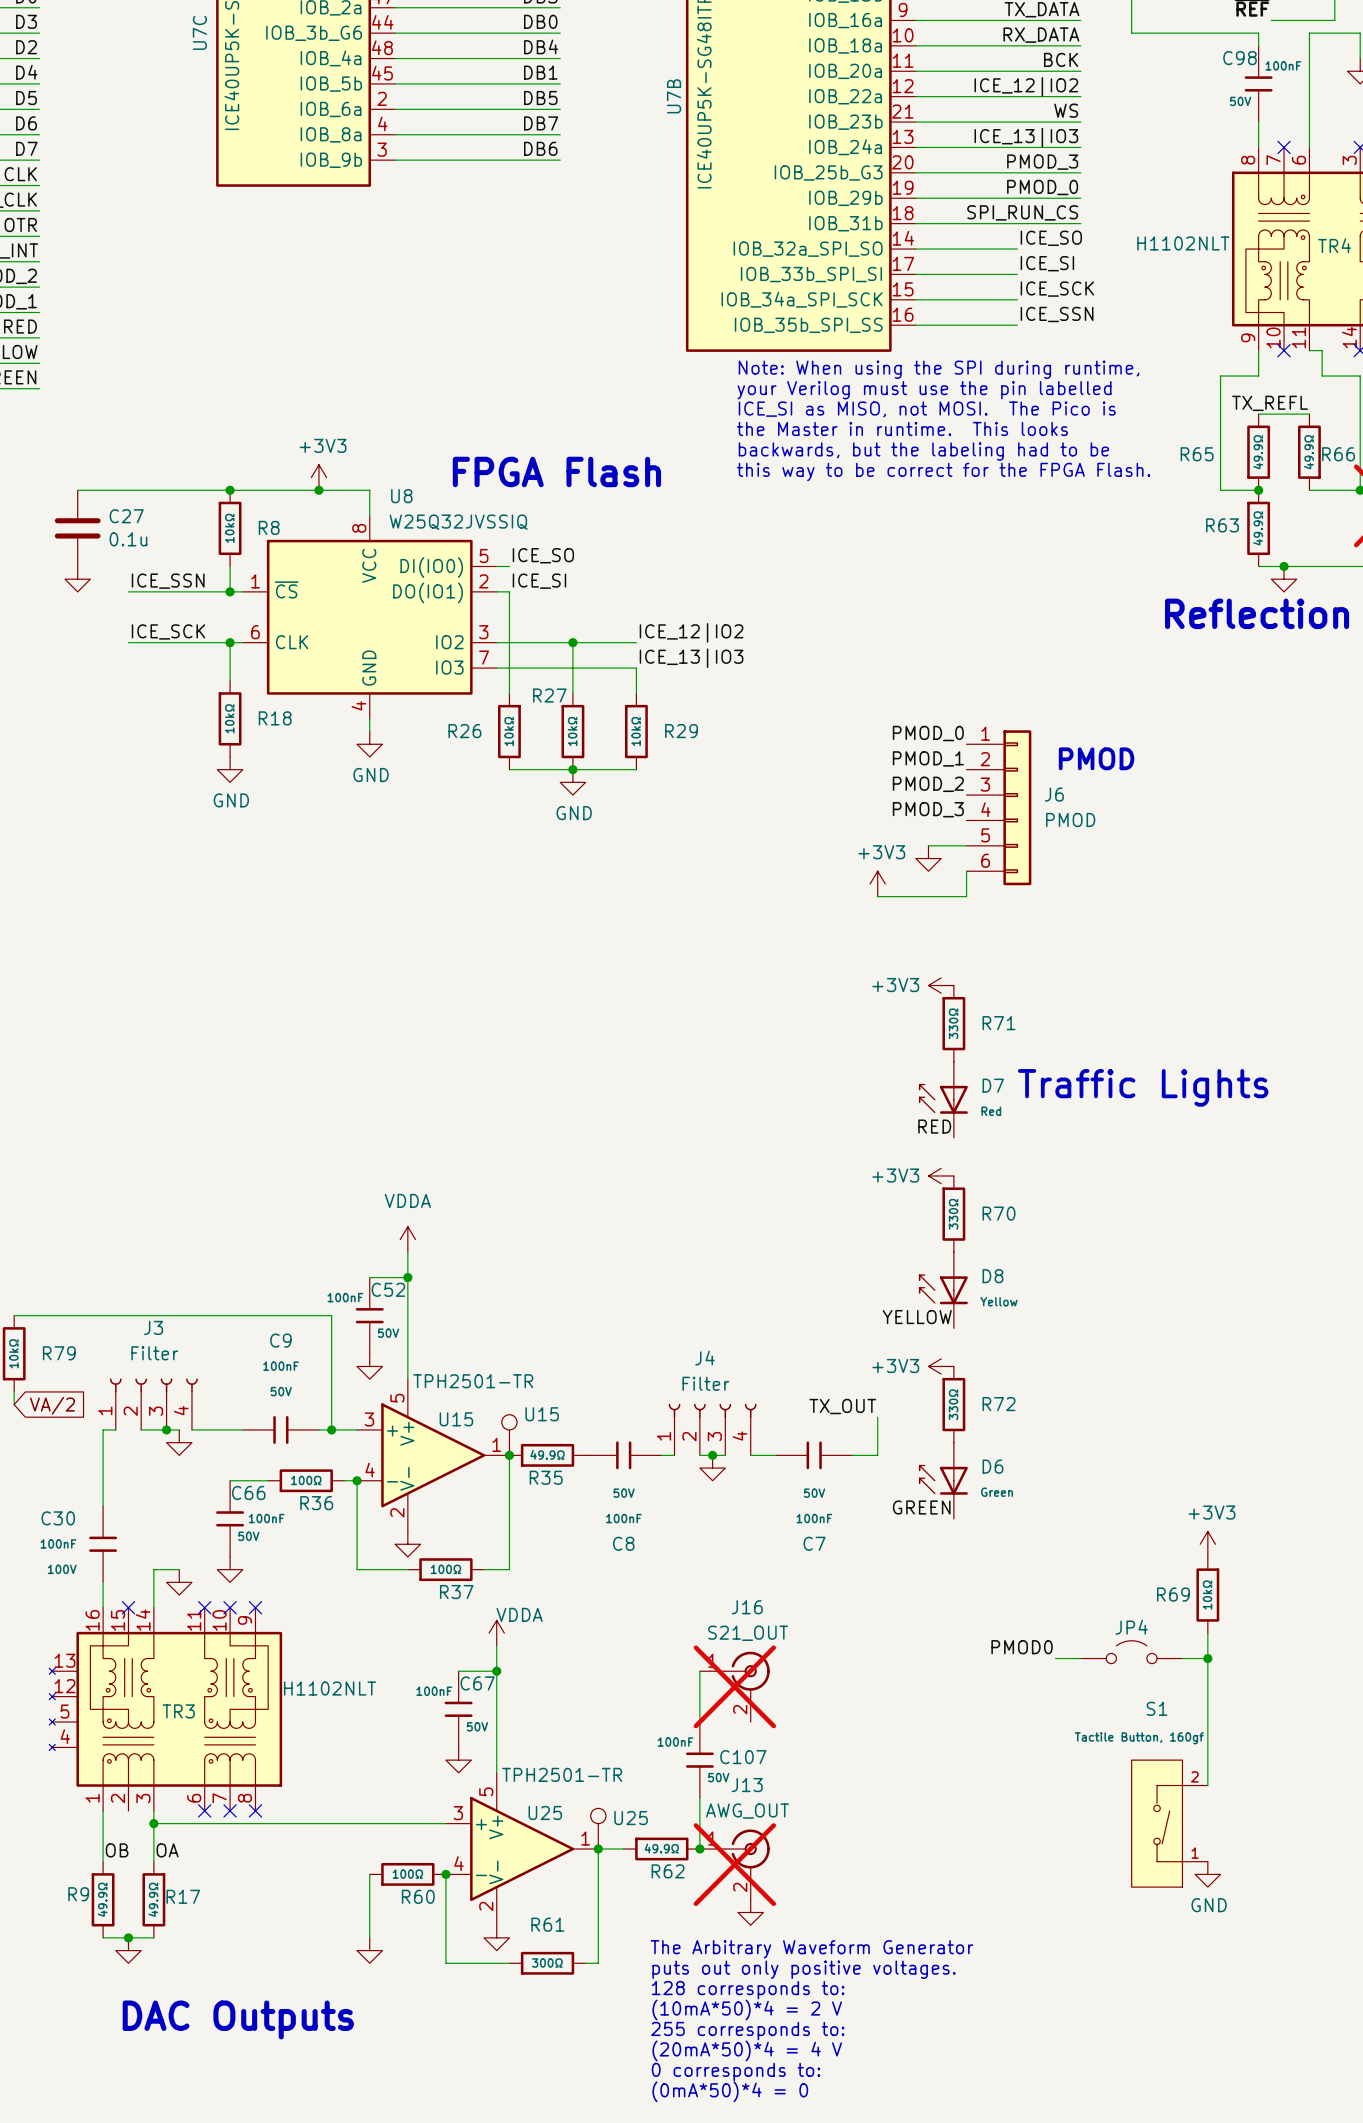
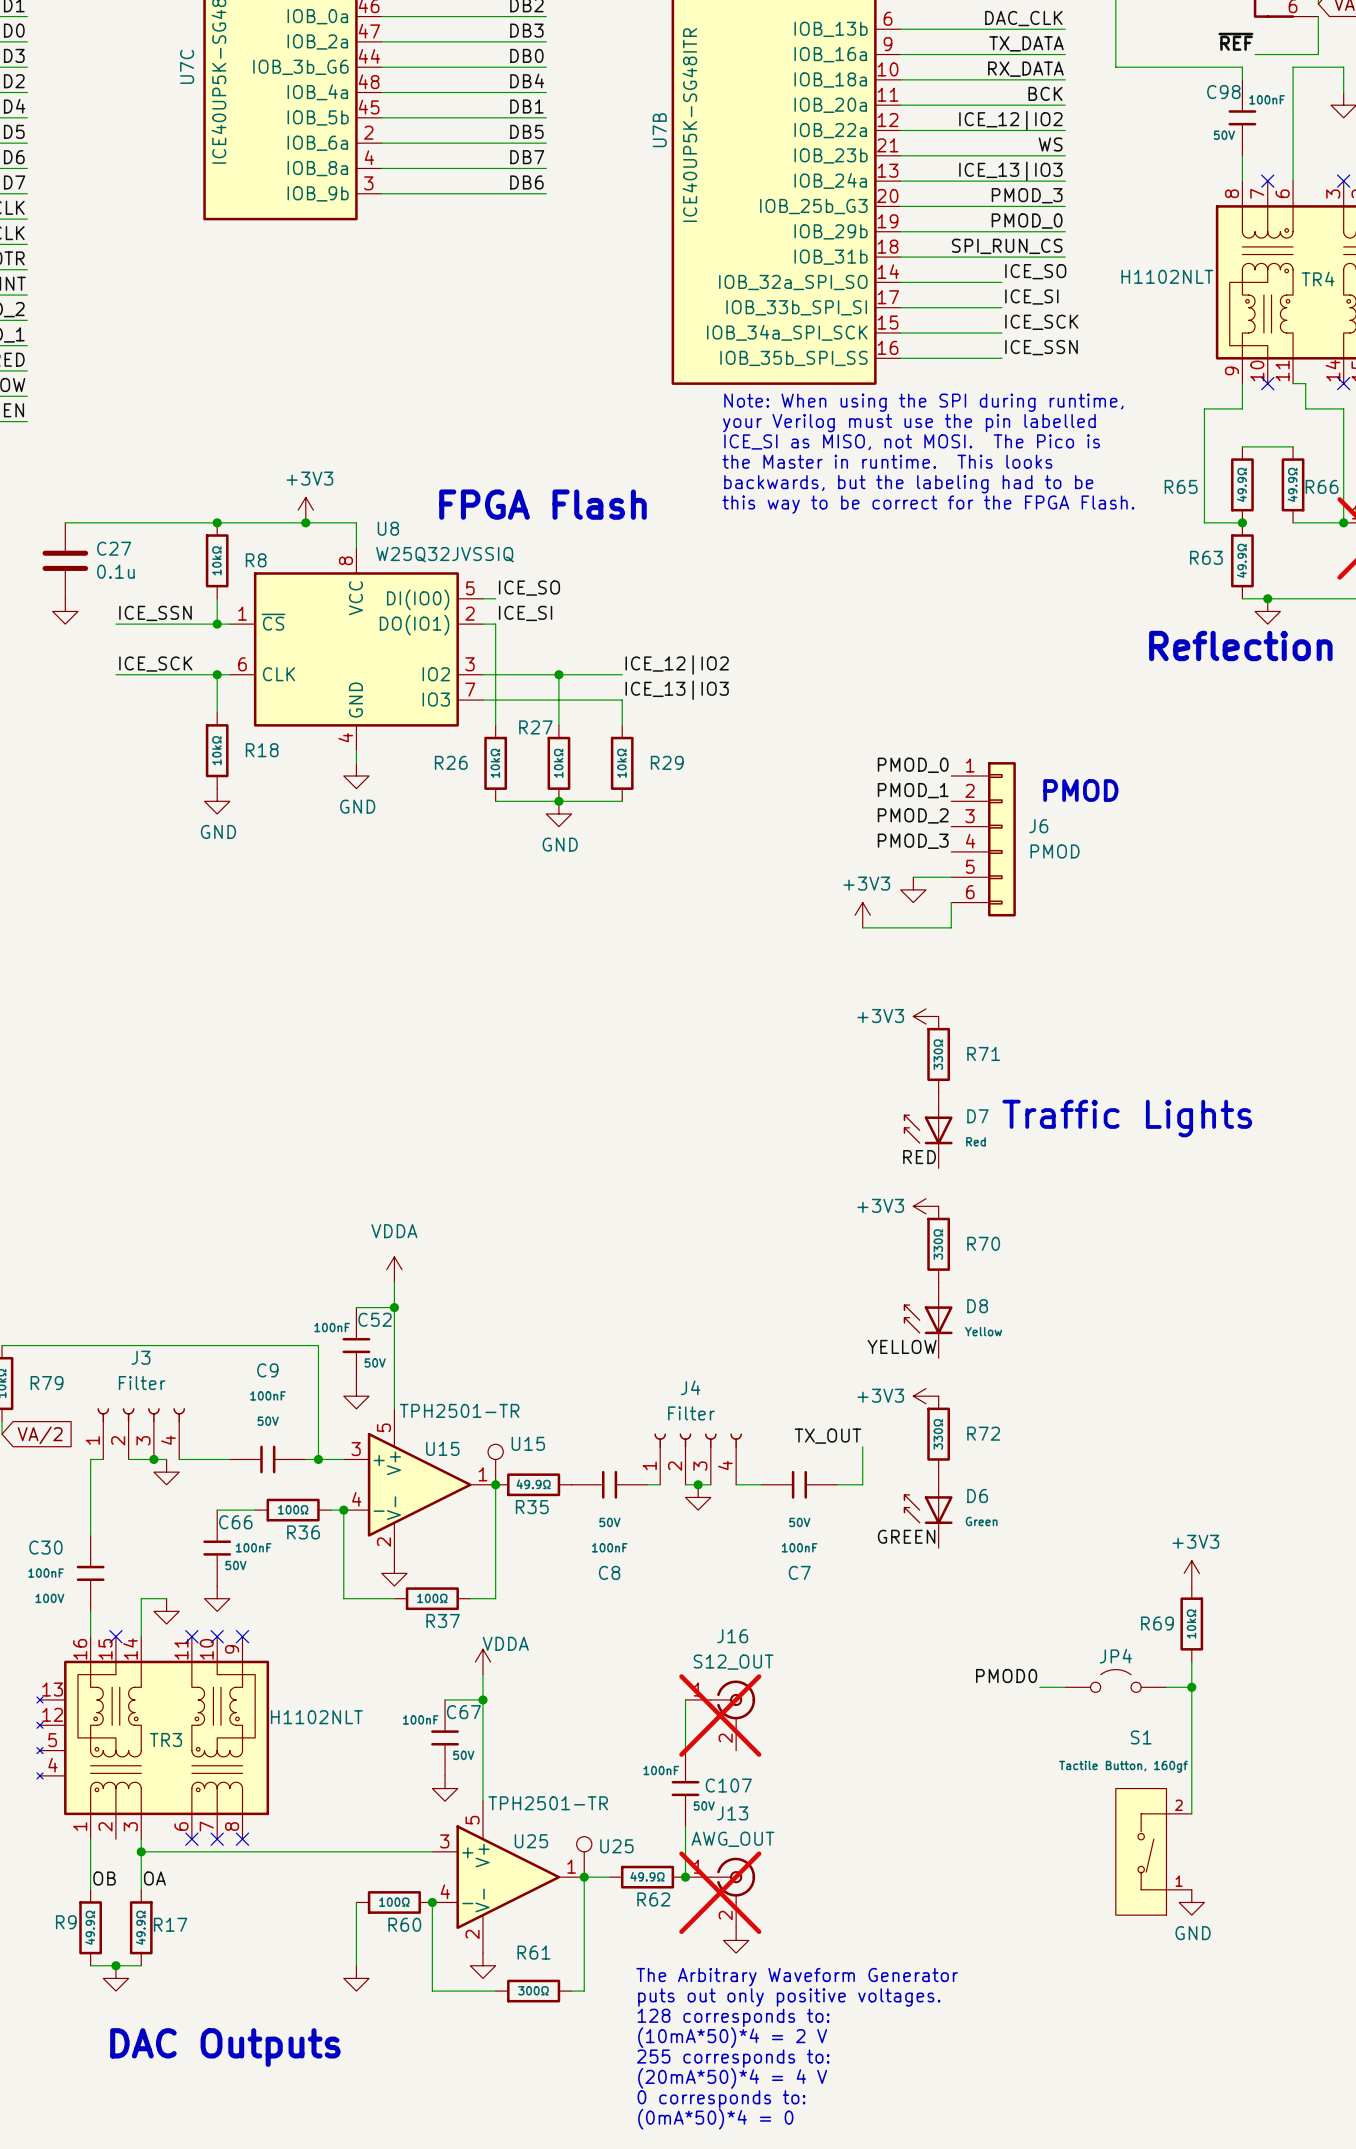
label: TX_REFL (1270, 403) -> none
J16 value: S21_OUT (748, 1633) -> S12_OUT (733, 1662)

